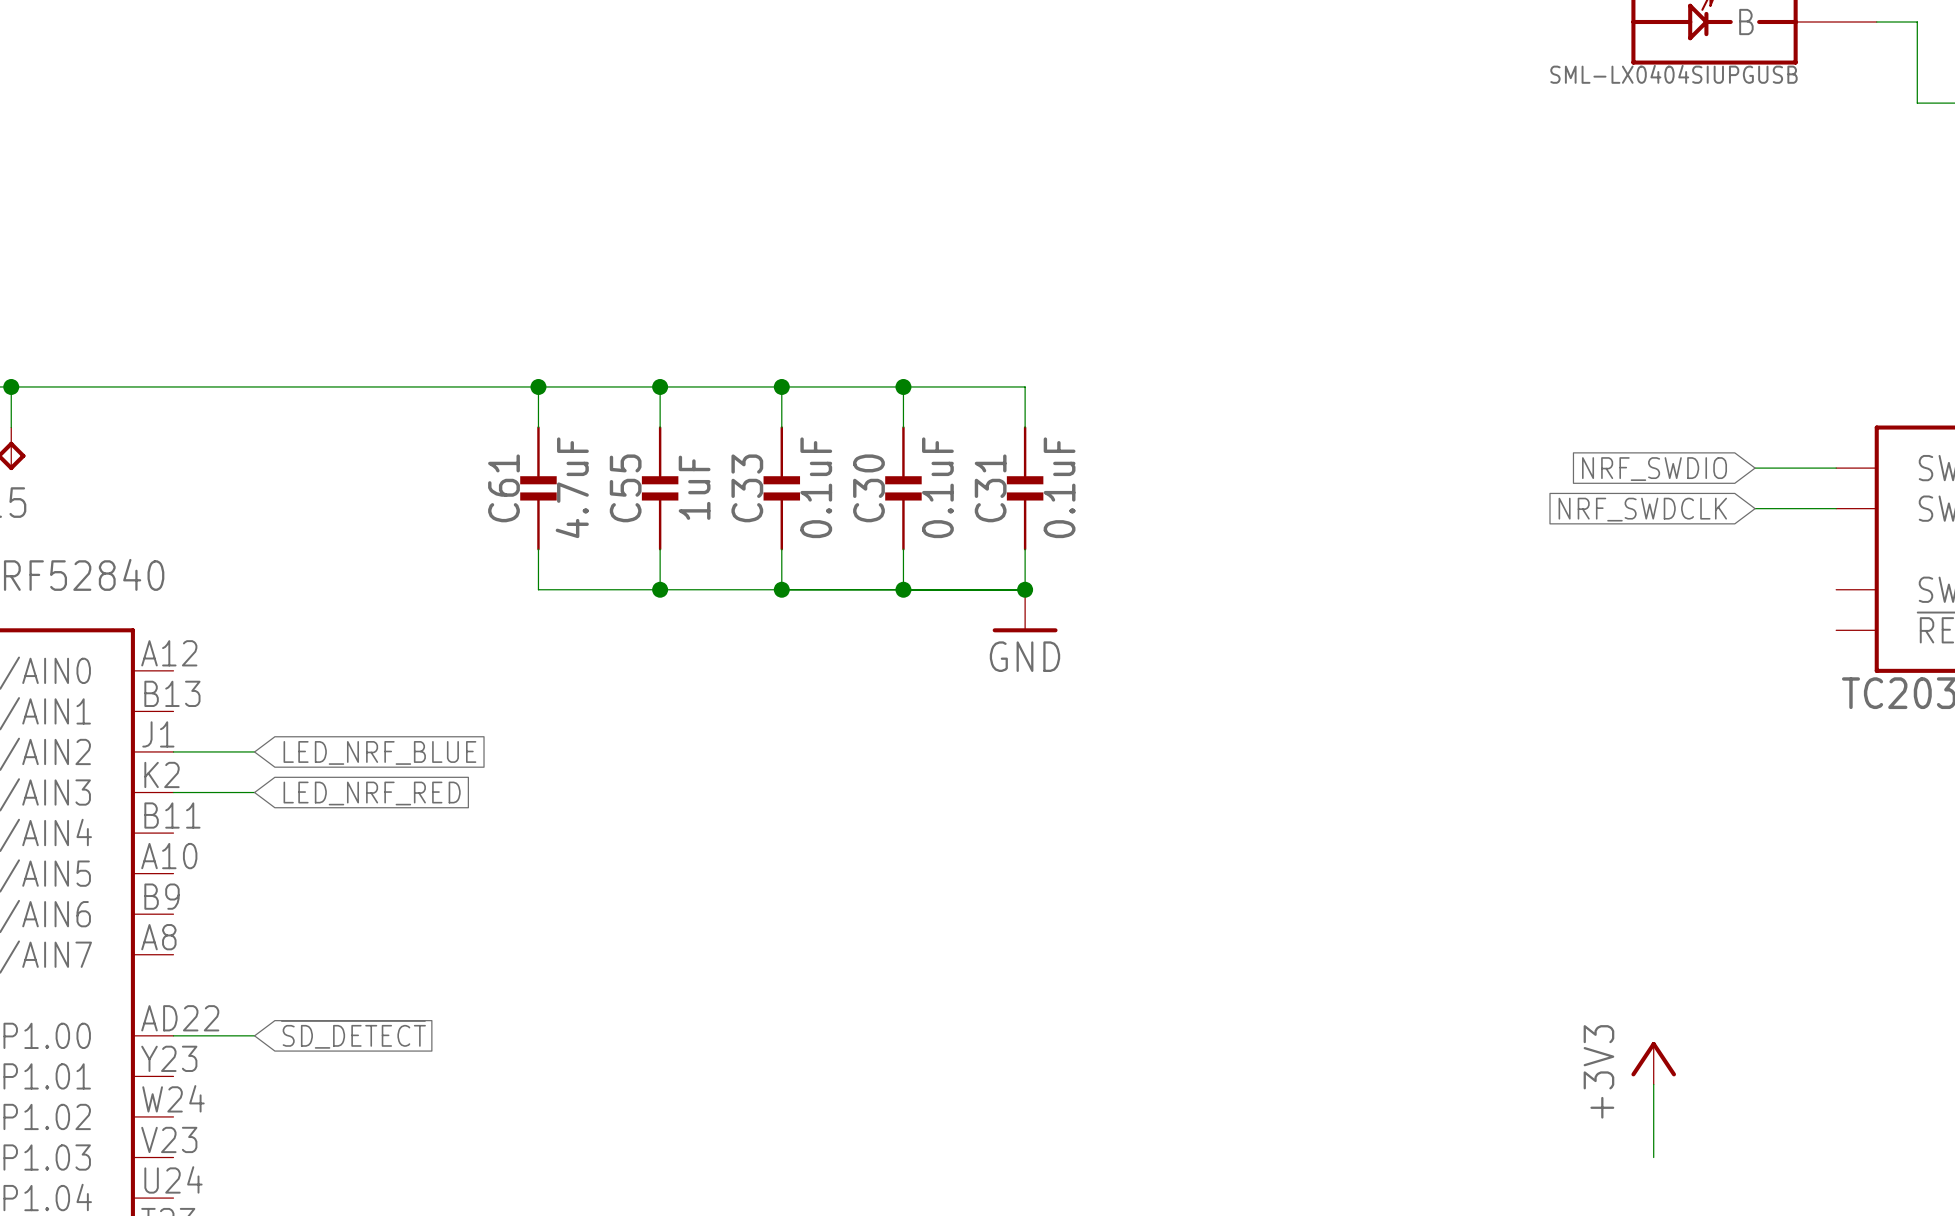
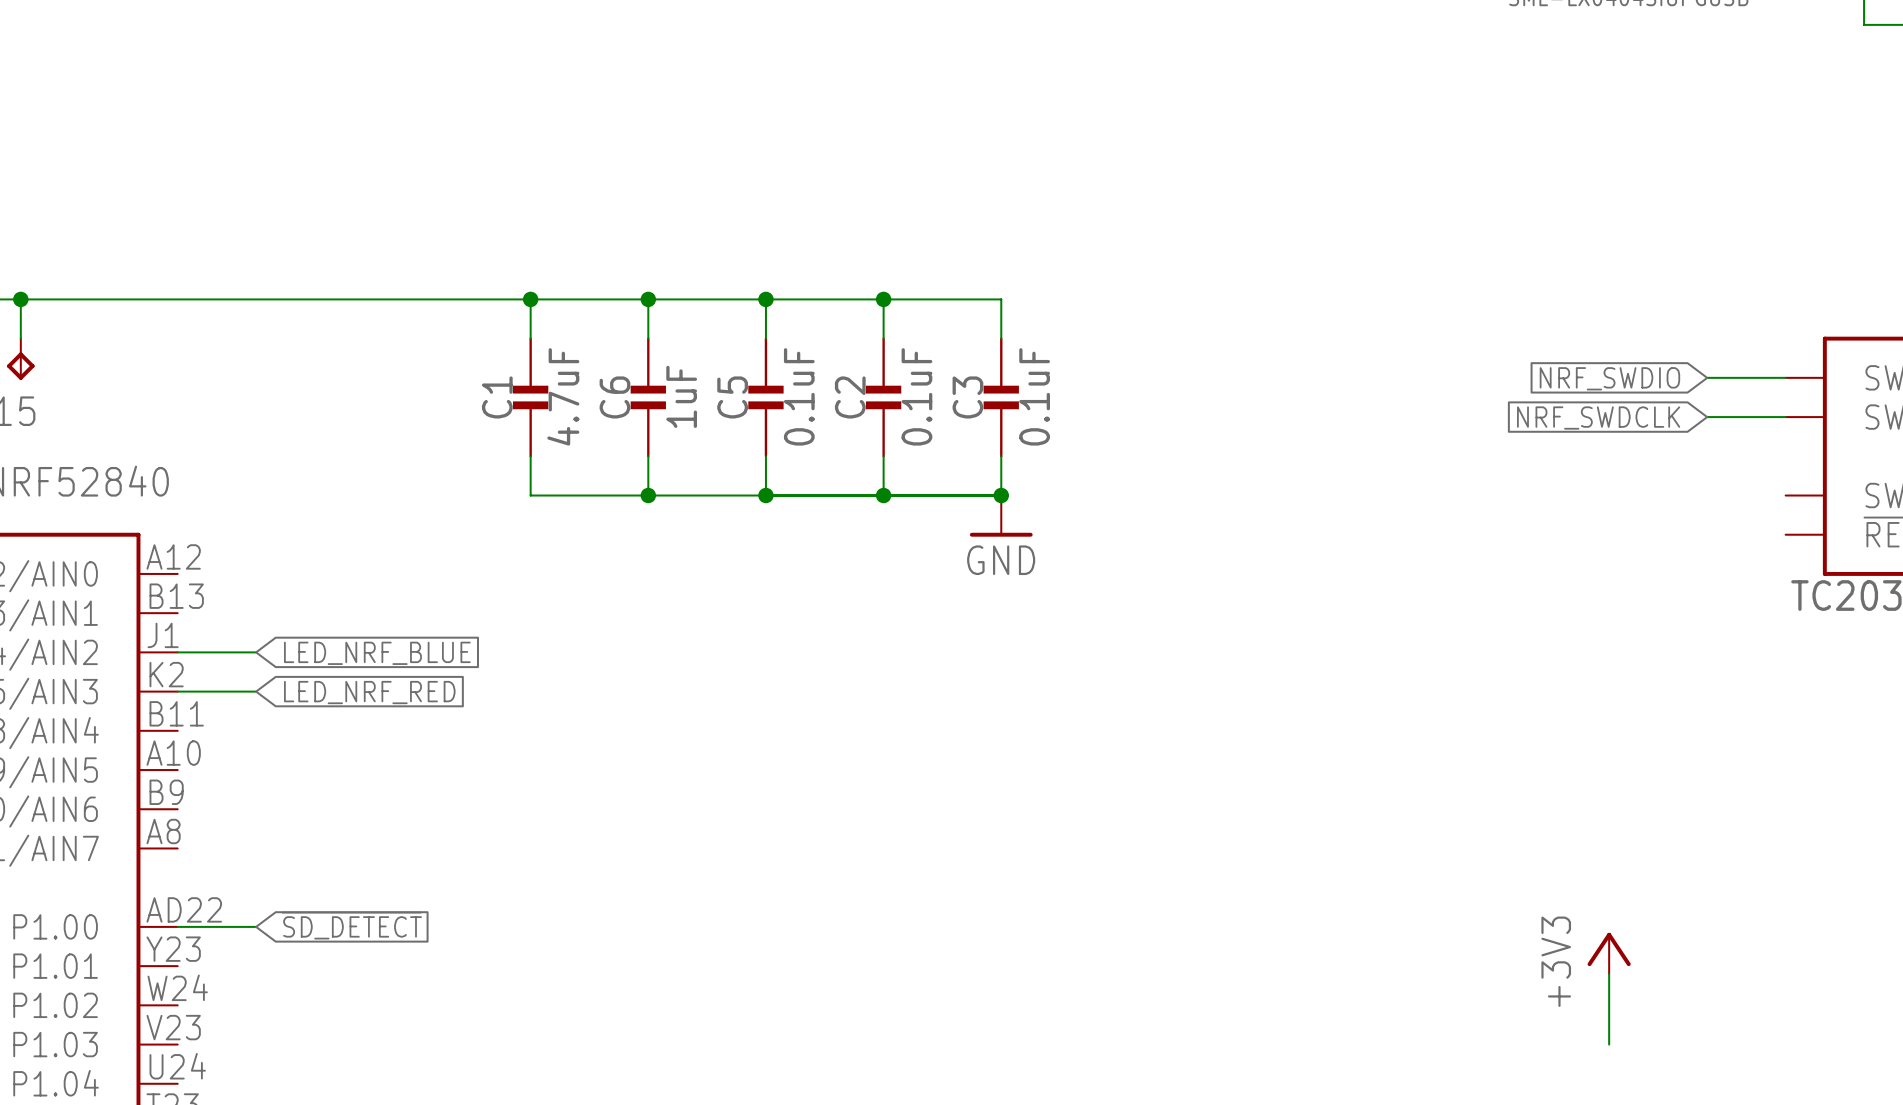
C61 name: C61 (503, 488) -> C1 (497, 397)
C55 name: C55 (625, 488) -> C6 (614, 397)
C33 name: C33 (747, 488) -> C5 (732, 397)
C30 name: C30 (868, 488) -> C2 (850, 397)
C31 name: C31 (990, 488) -> C3 (967, 397)

